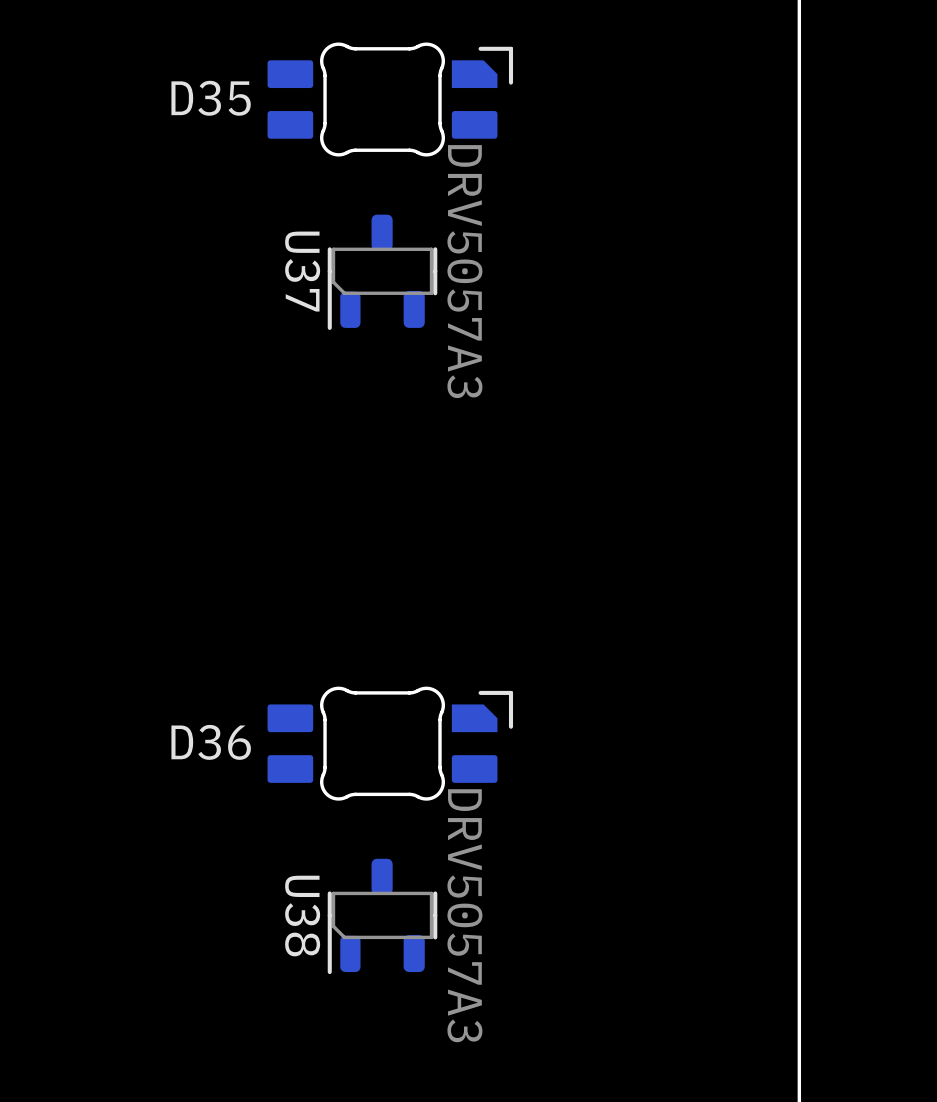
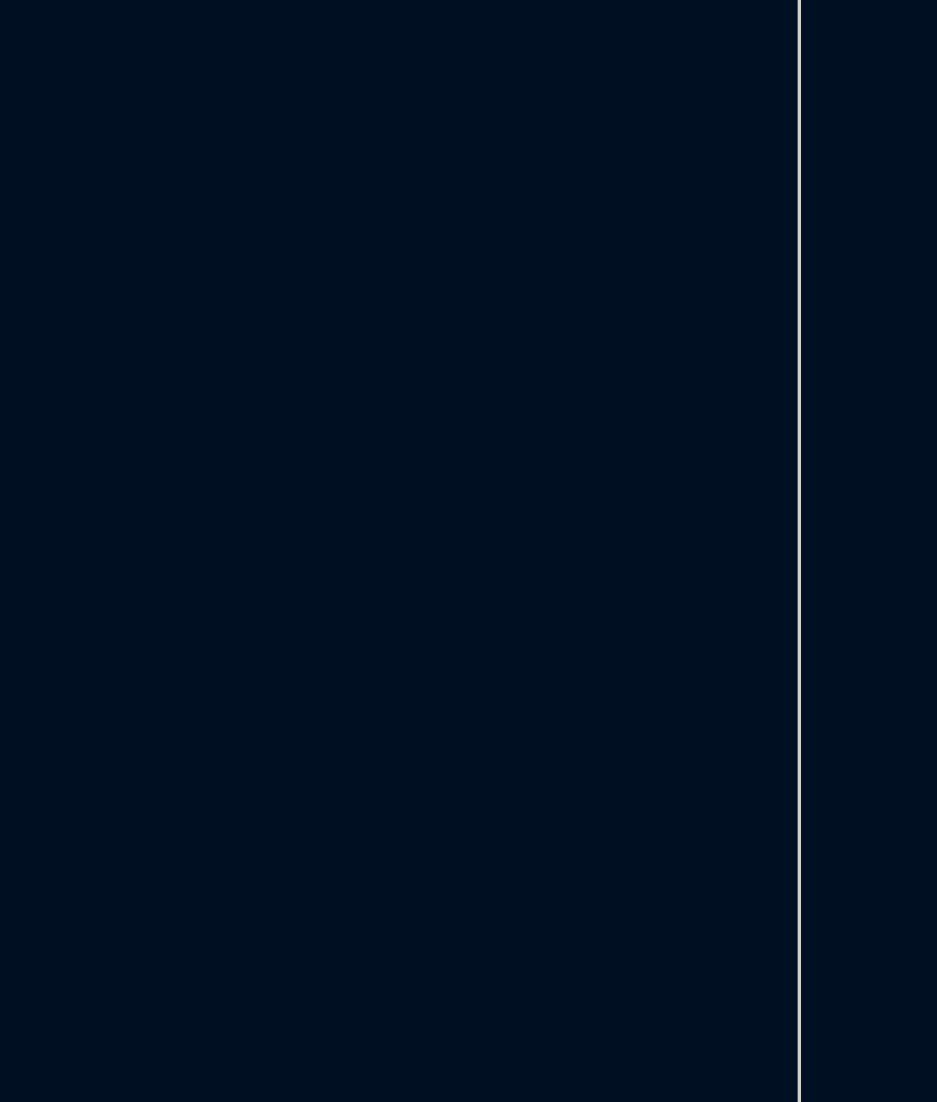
D35: (390, 99) -> none
U37: DRV5057A3 (382, 272) -> none
D36: (390, 743) -> none
U38: DRV5057A3 (382, 916) -> none

